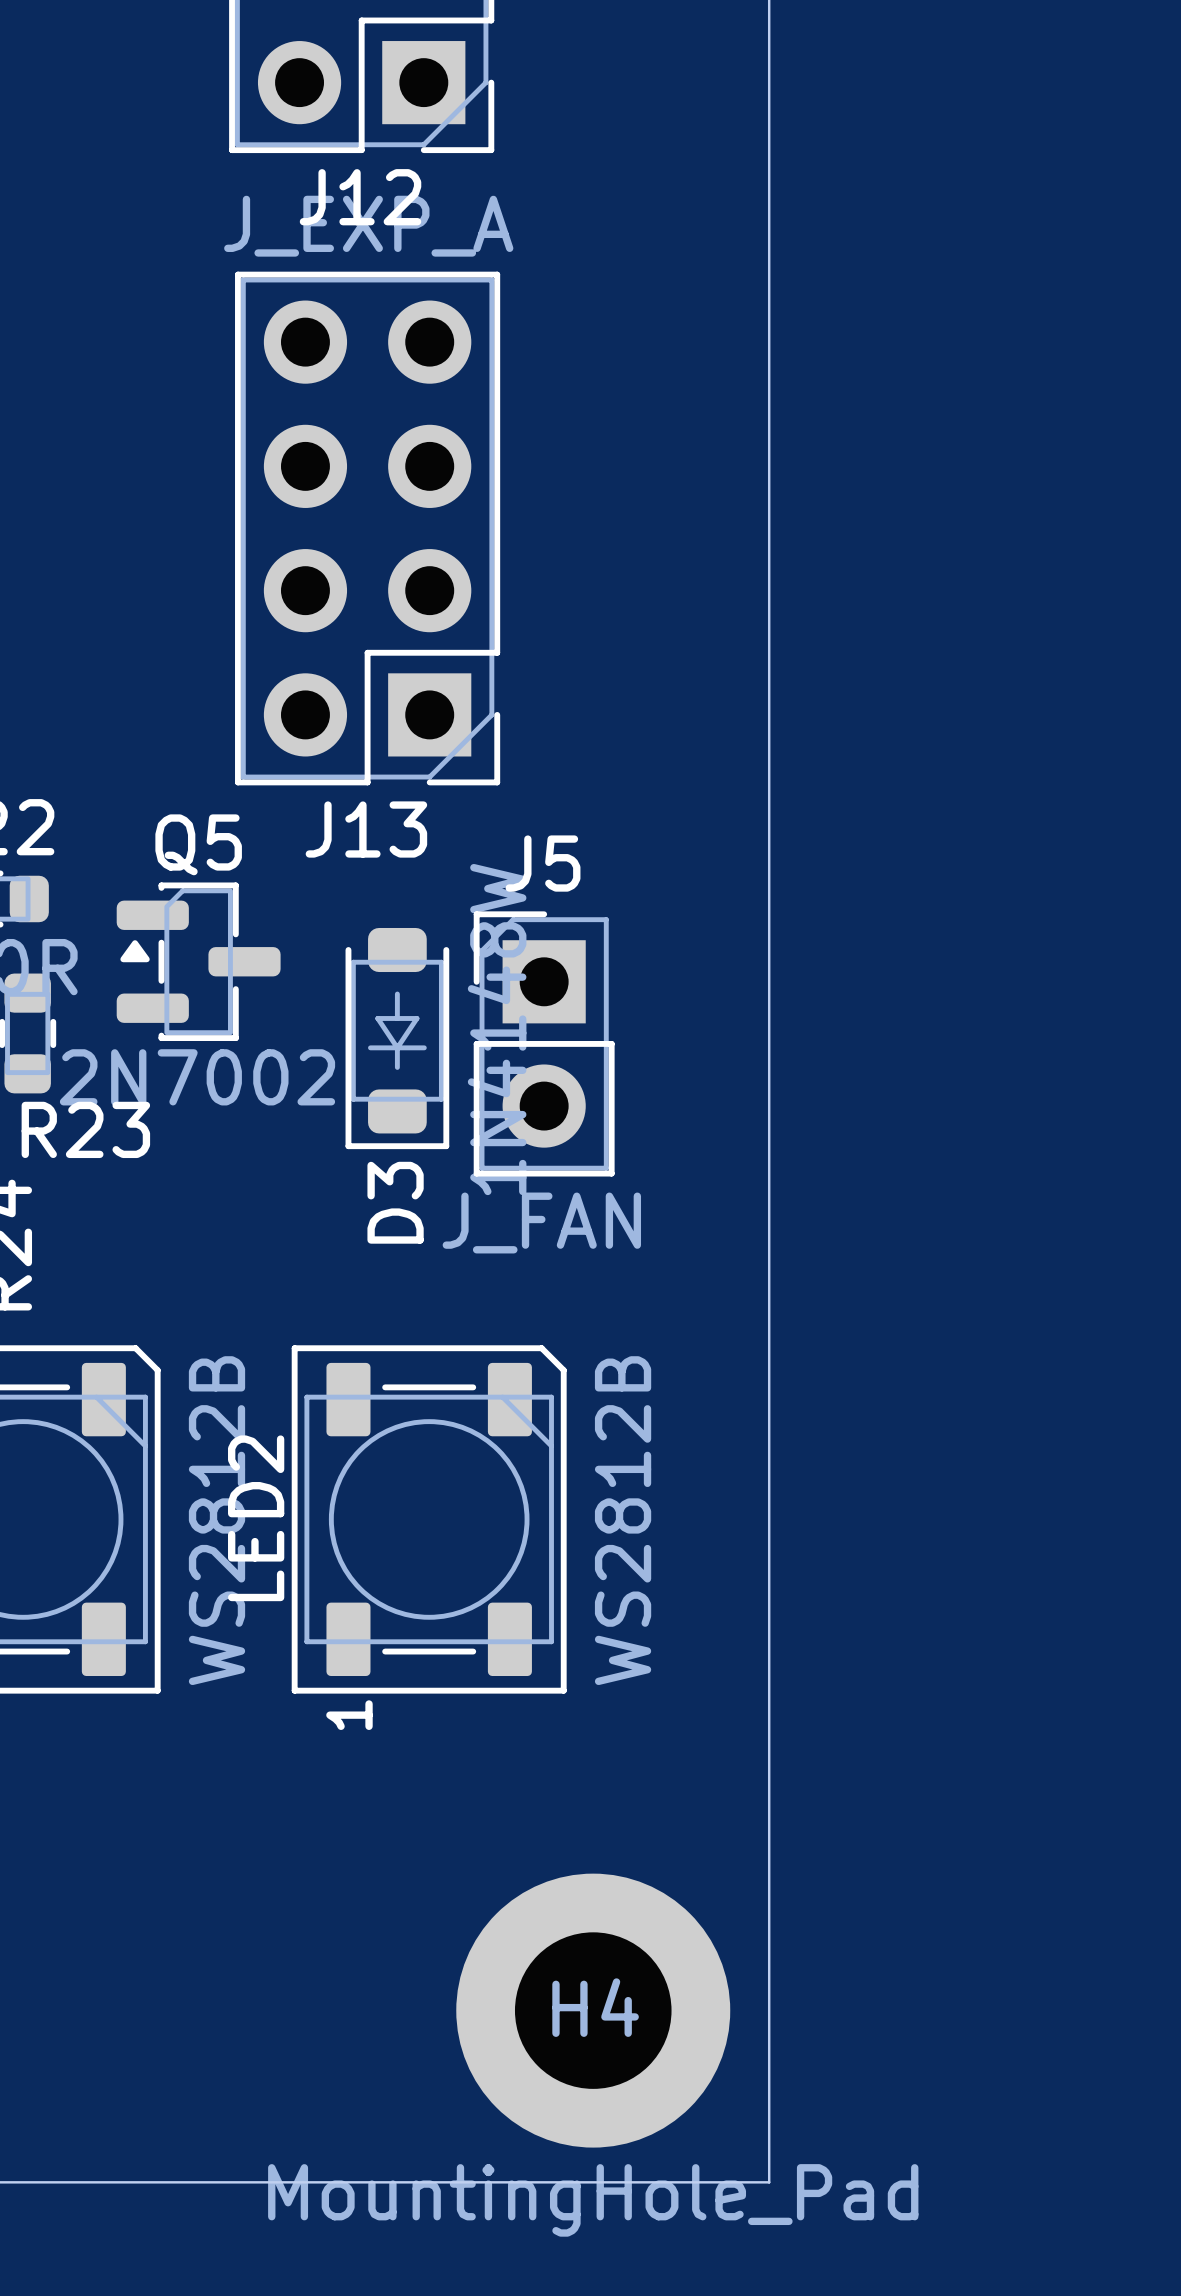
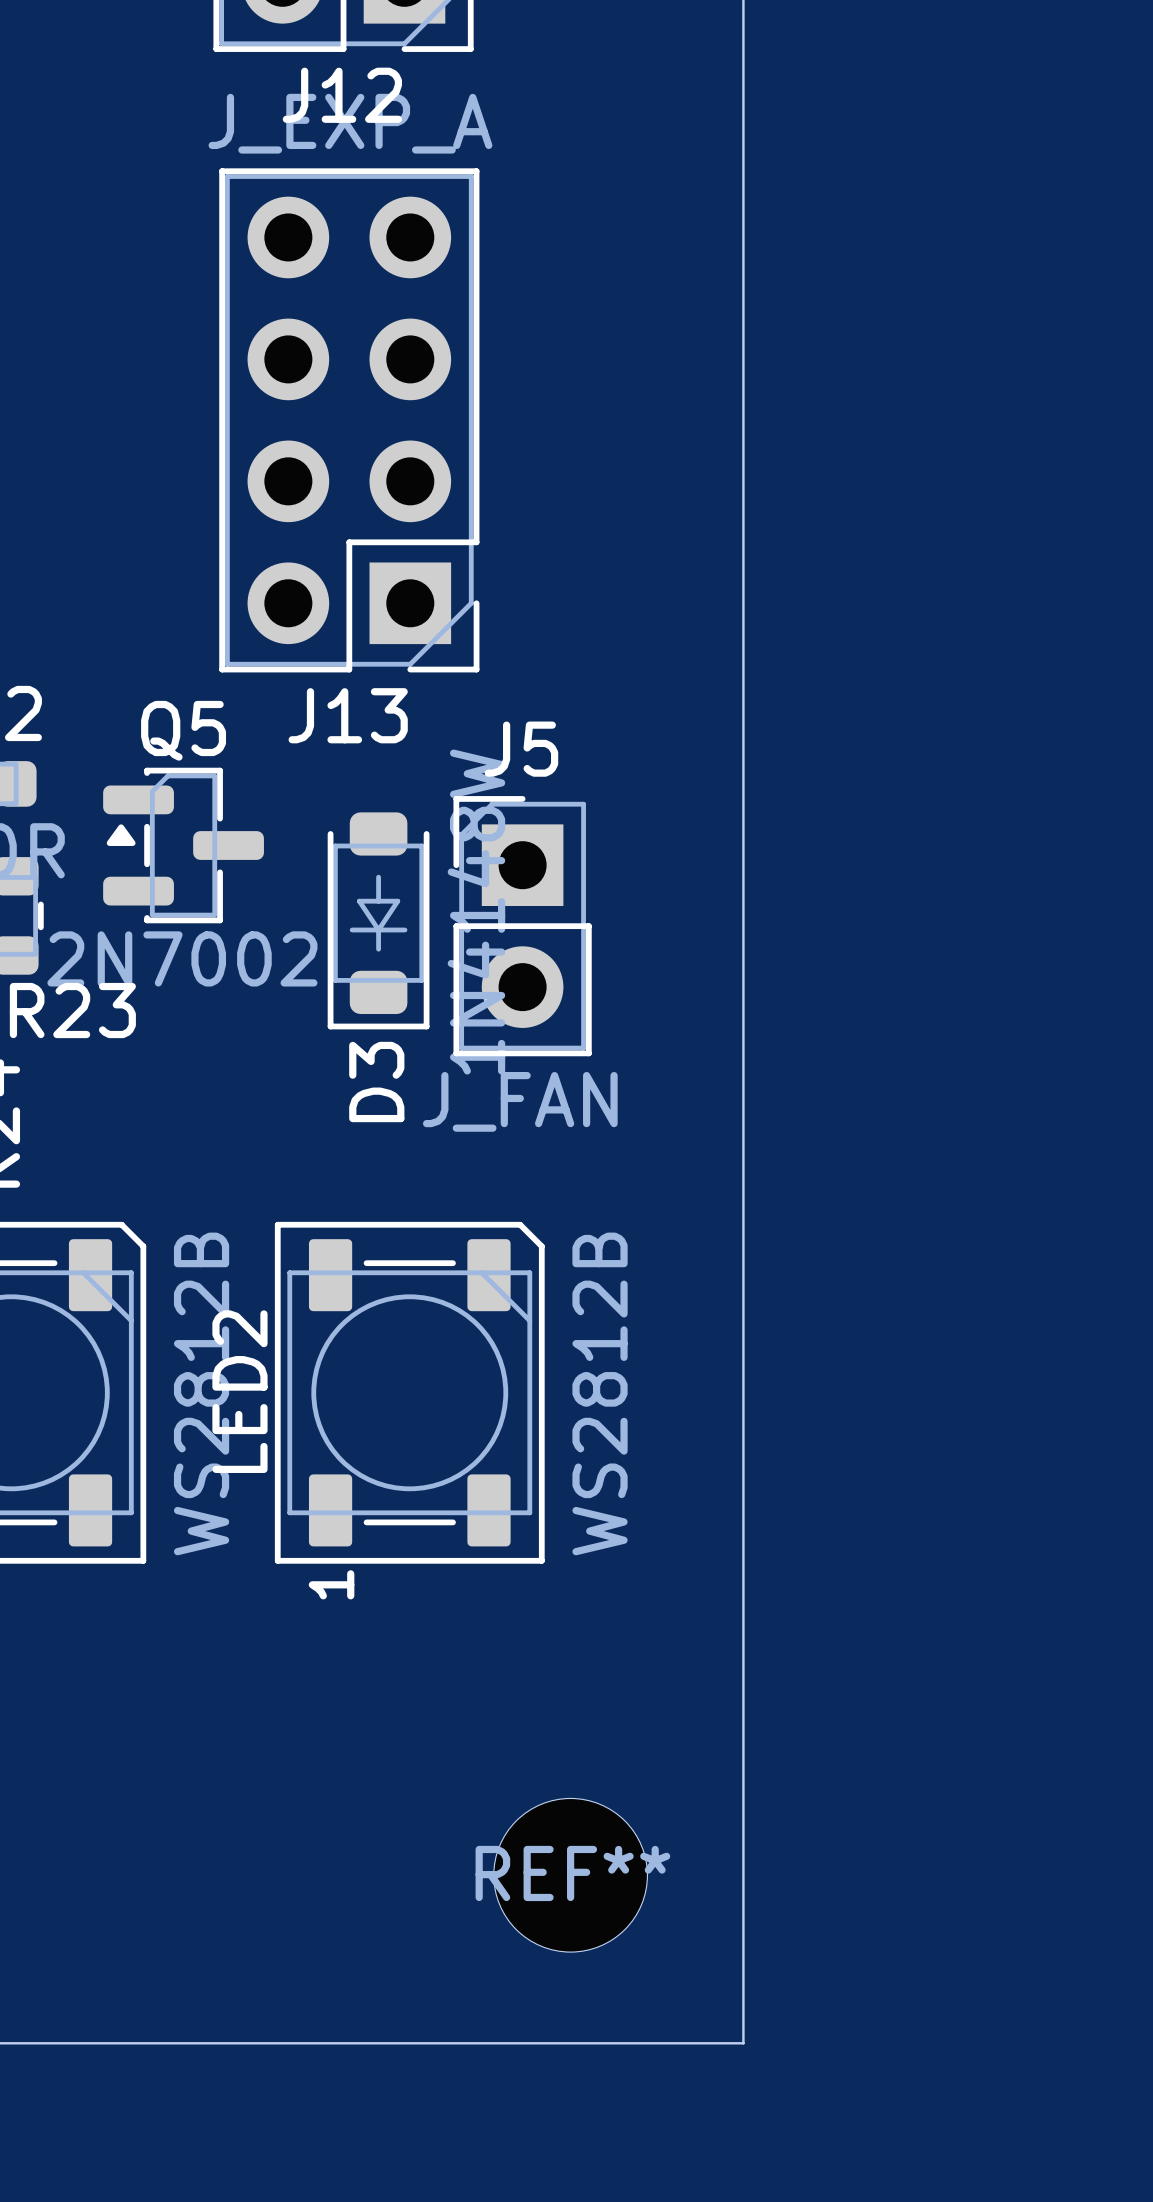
H4: MountingHole_Pad (593, 2010) -> none
REF**: none -> (570, 1875)

